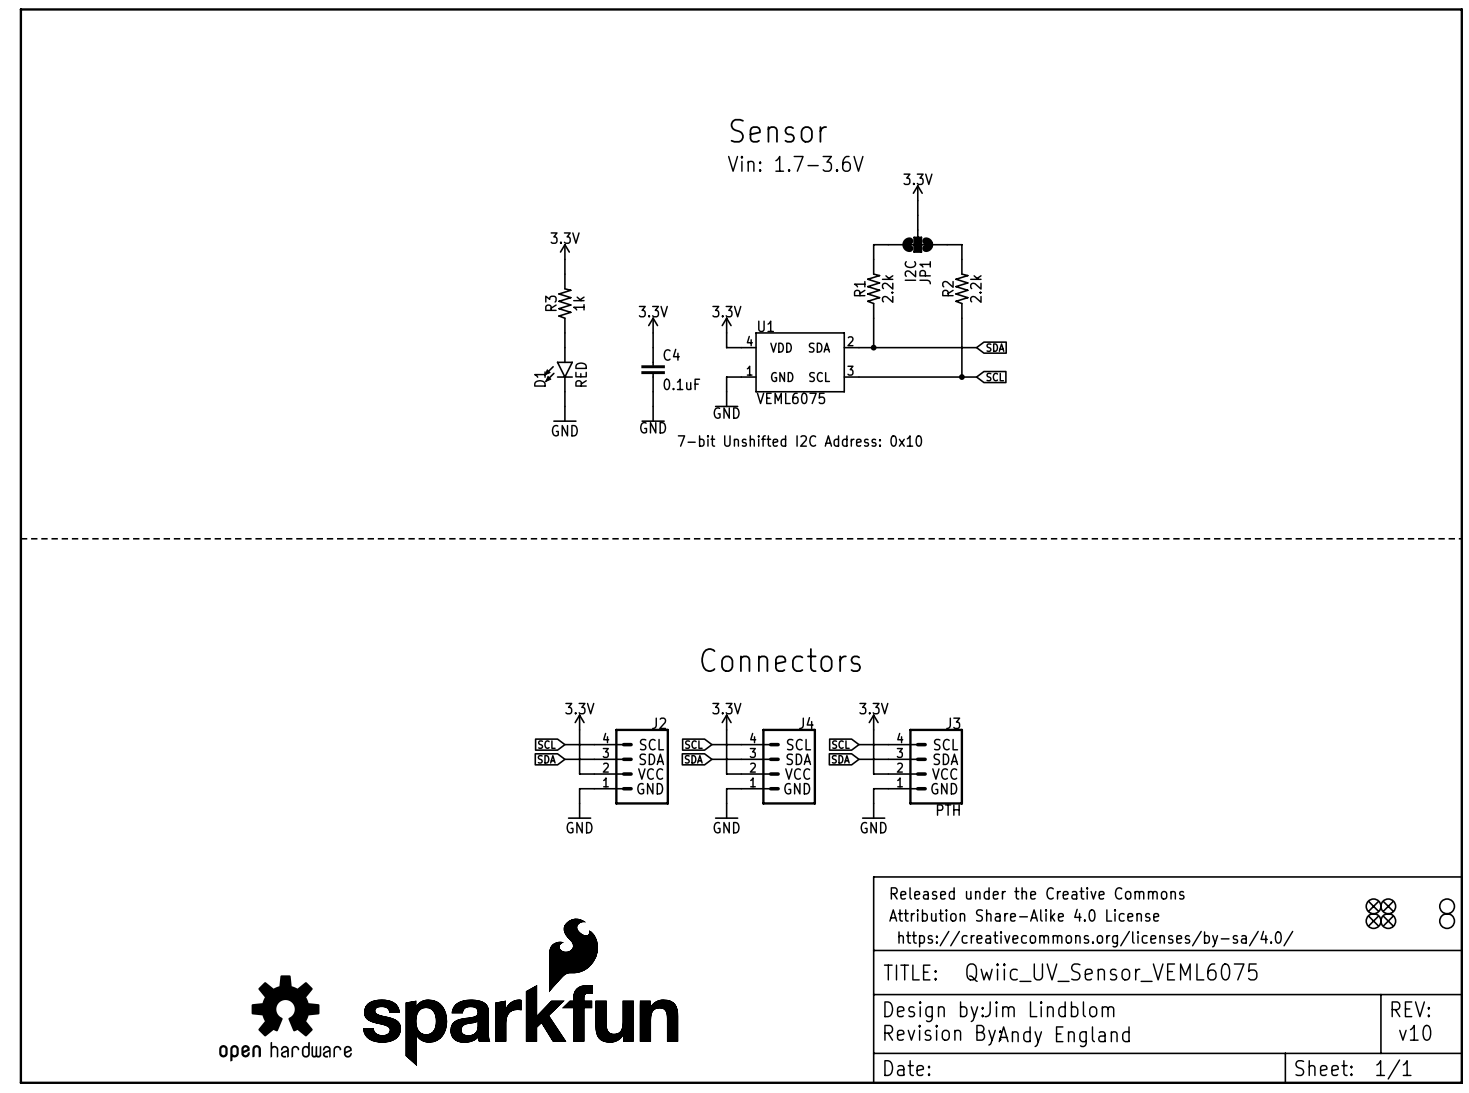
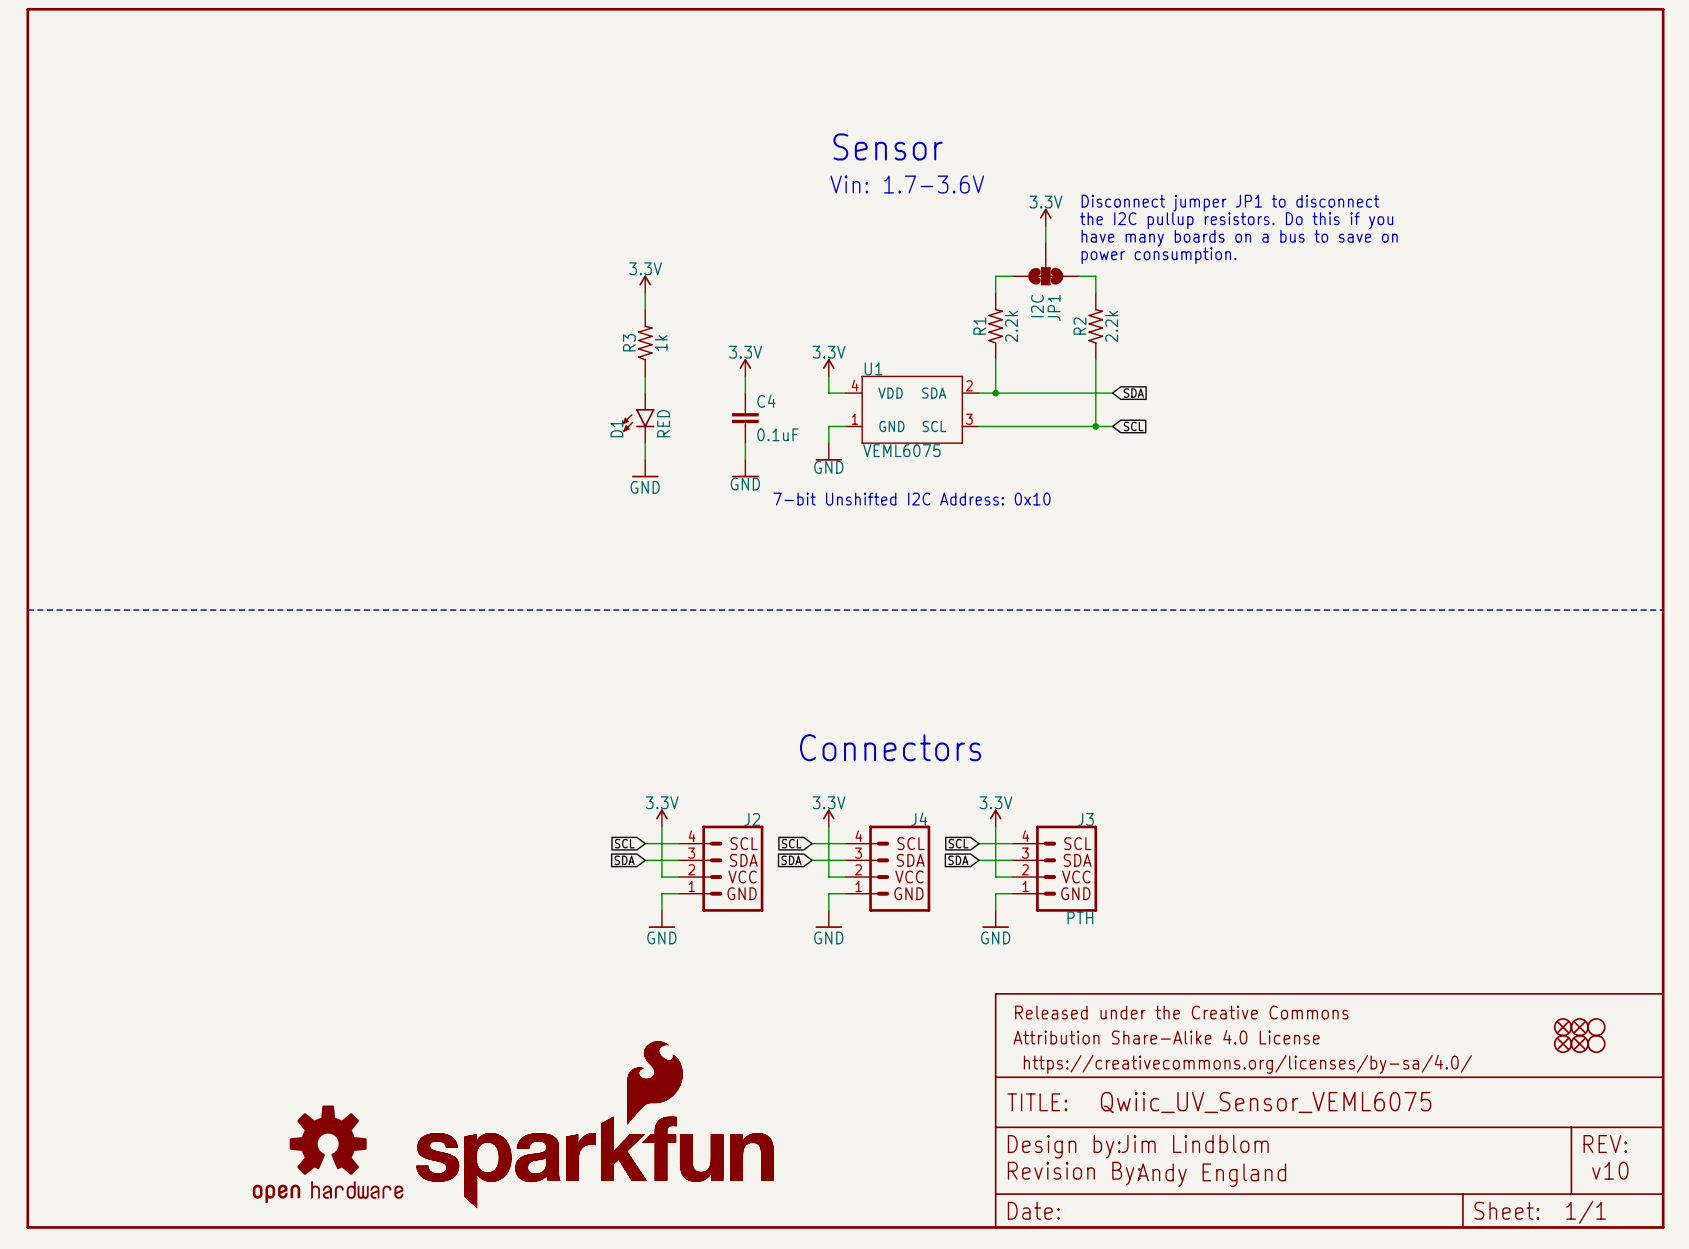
text: none -> Disconnect jumper JP1 to disconnect (1230, 203)
text: none -> the I2C pullup resistors. Do this if you (1236, 220)
text: none -> have many boards on a bus to save on (1239, 238)
text: none -> power consumption. (1159, 255)
part: none -> (1596, 1027)
part: (1447, 906) -> none
part: none -> (1596, 1043)
part: (1447, 921) -> none

